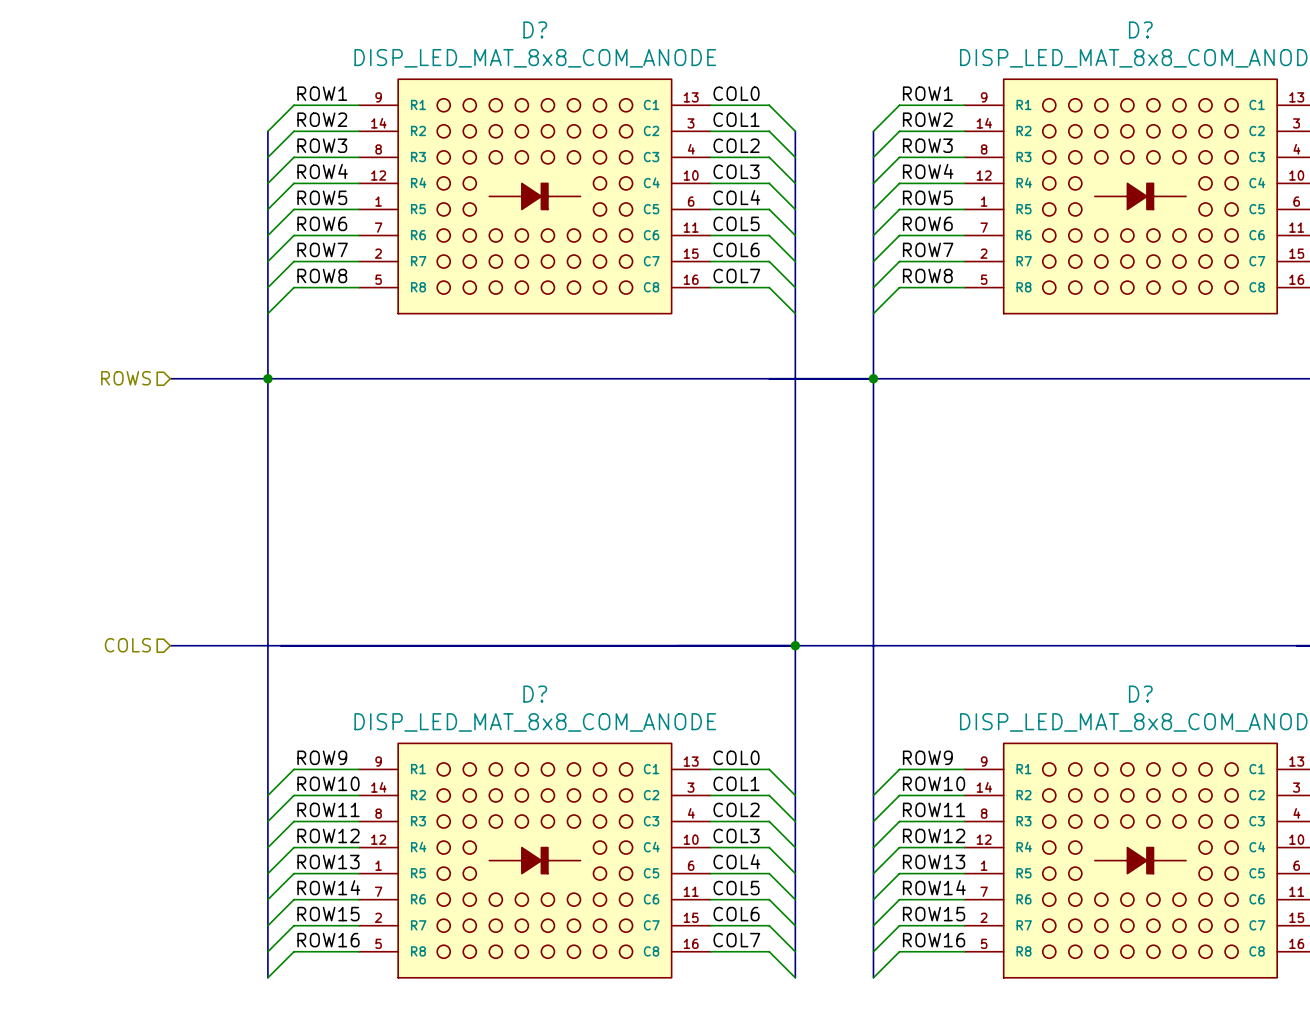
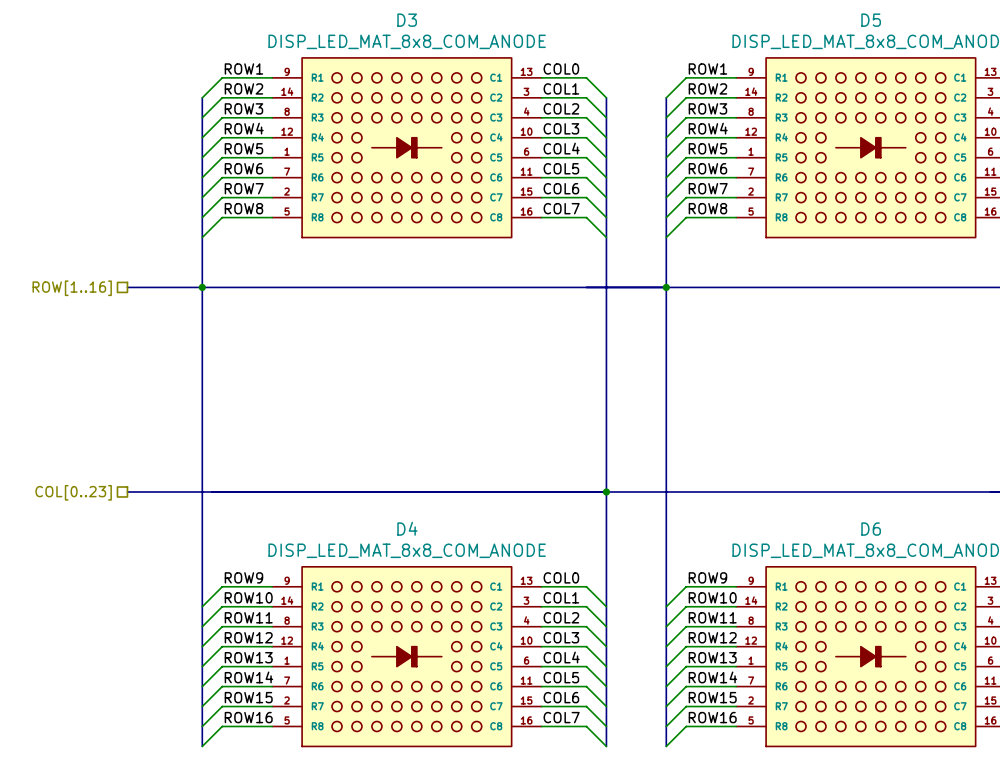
D? name: D? (535, 29) -> D3 (407, 20)
D? name: D? (1140, 29) -> D5 (871, 20)
hierarchical label shape: input (126, 378) -> passive (72, 288)
hierarchical label: ROWS (126, 378) -> ROW[1..16] (72, 288)
hierarchical label shape: input (127, 645) -> passive (73, 492)
hierarchical label: COLS (127, 645) -> COL[0..23] (73, 492)
D? name: D? (535, 694) -> D4 (407, 528)
D? name: D? (1140, 694) -> D6 (871, 529)

